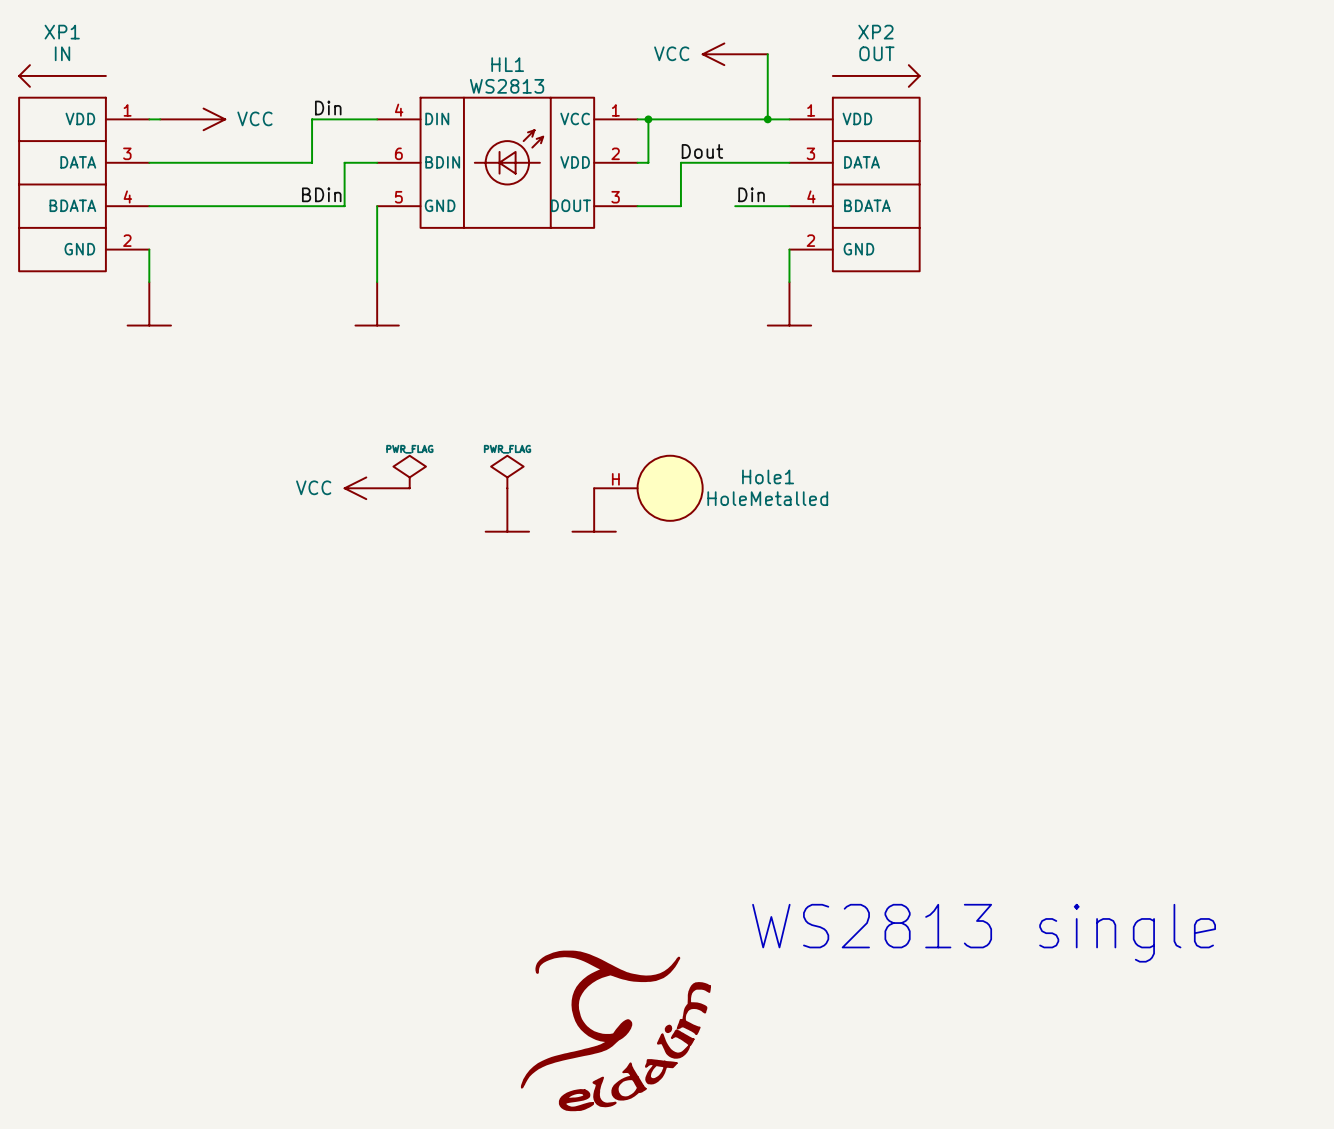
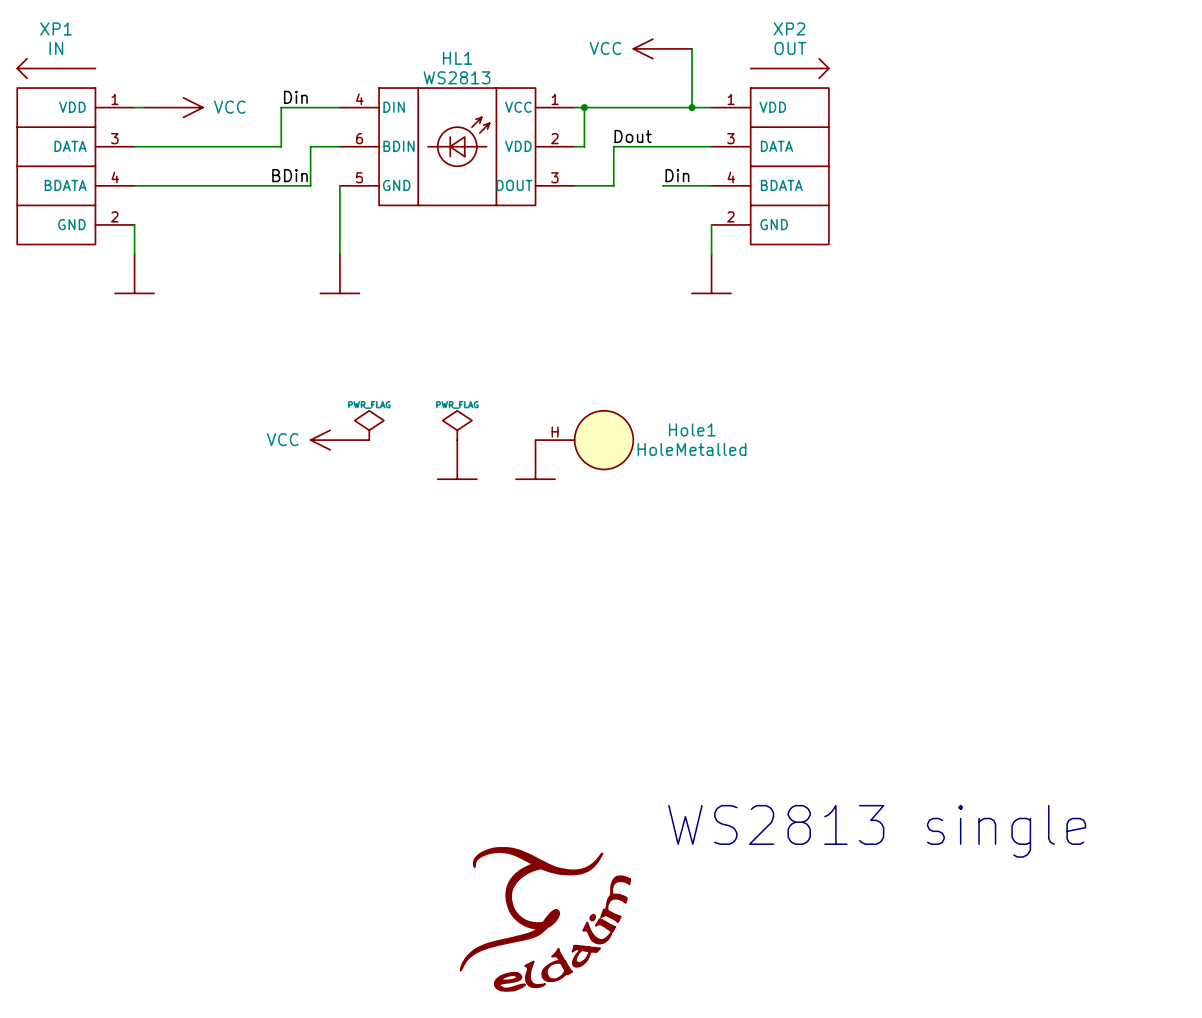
text position: WS2813 single (984, 933) -> WS2813 single (877, 831)
part position: (615, 1030) -> (545, 919)

